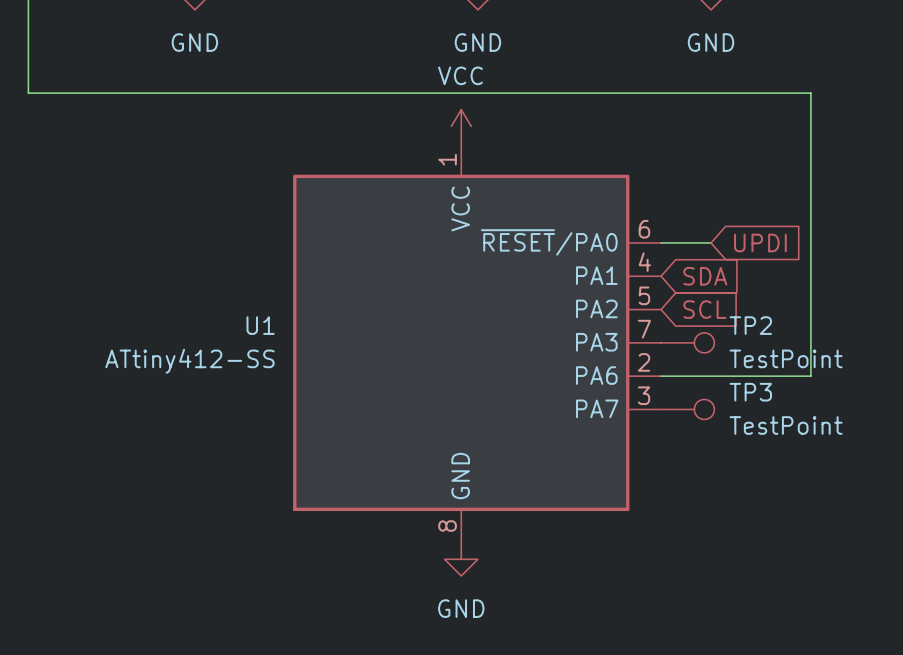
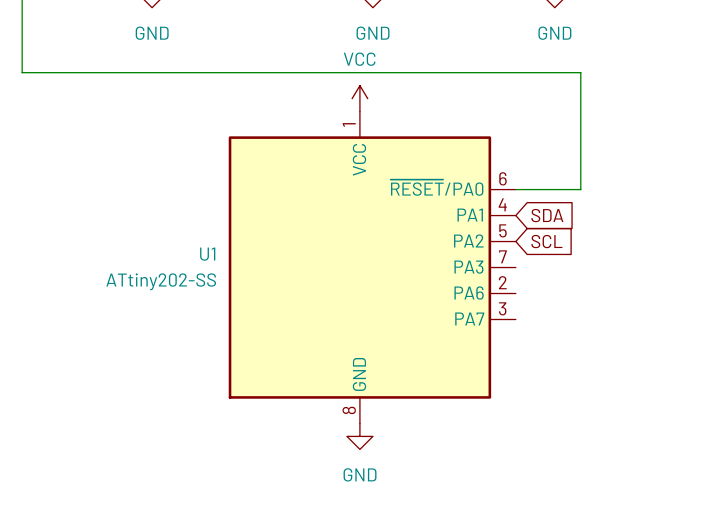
wire: (744, 93) (810, 93) (810, 376) (661, 376) -> (580, 72) (580, 189) (554, 189)
global label: UPDI (760, 242) -> none
TP2: TestPoint (687, 342) -> none
U1 value: ATtiny412-SS (190, 361) -> ATtiny202-SS (161, 281)
TP3: TestPoint (687, 409) -> none

